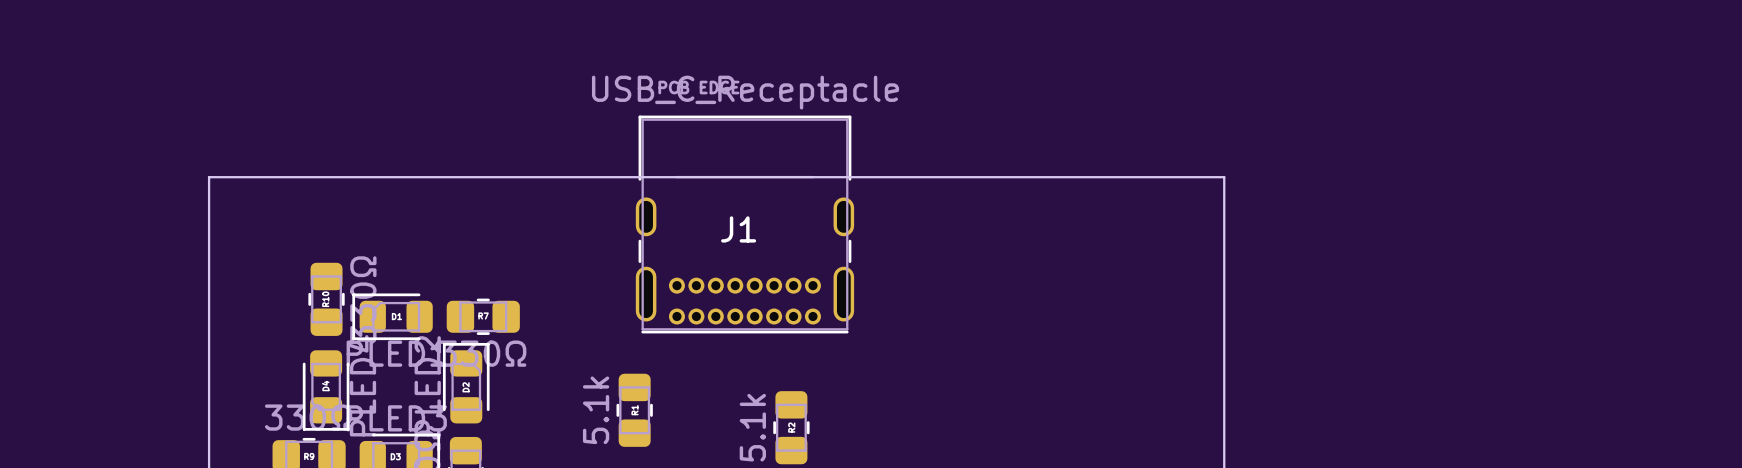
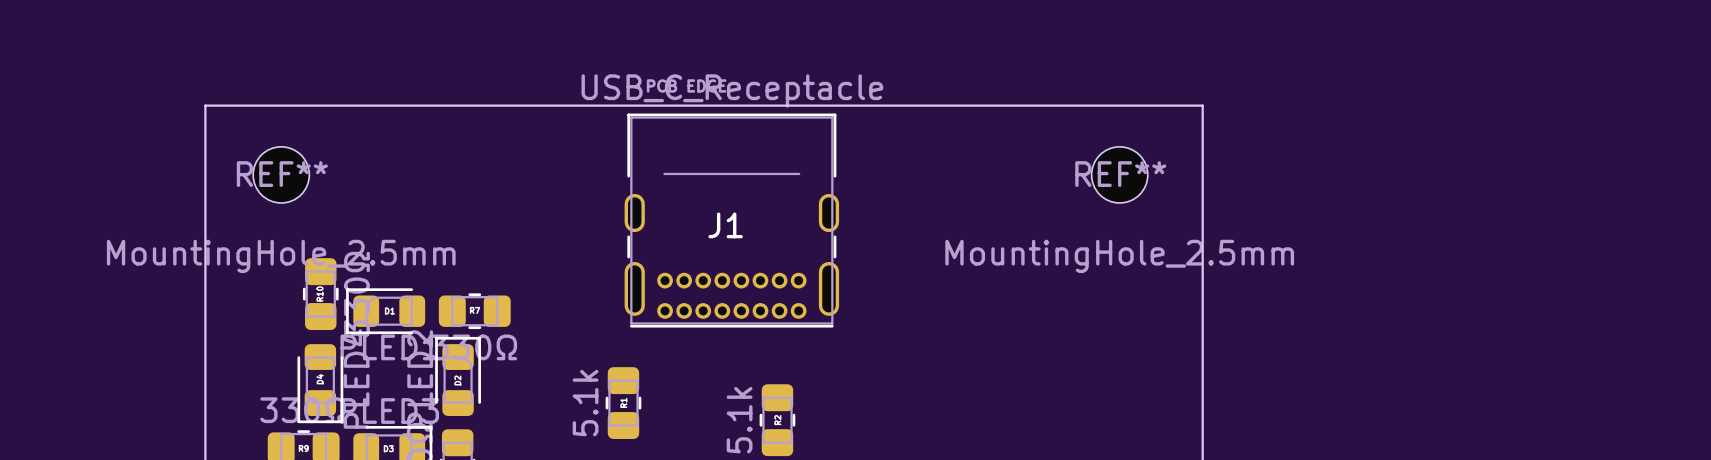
board edge: (209, 177) (1224, 177) -> (205, 174) (205, 105) (1202, 105) (1202, 174)
REF**: none -> MountingHole_2.5mm (281, 174)
REF**: none -> MountingHole_2.5mm (1119, 174)

